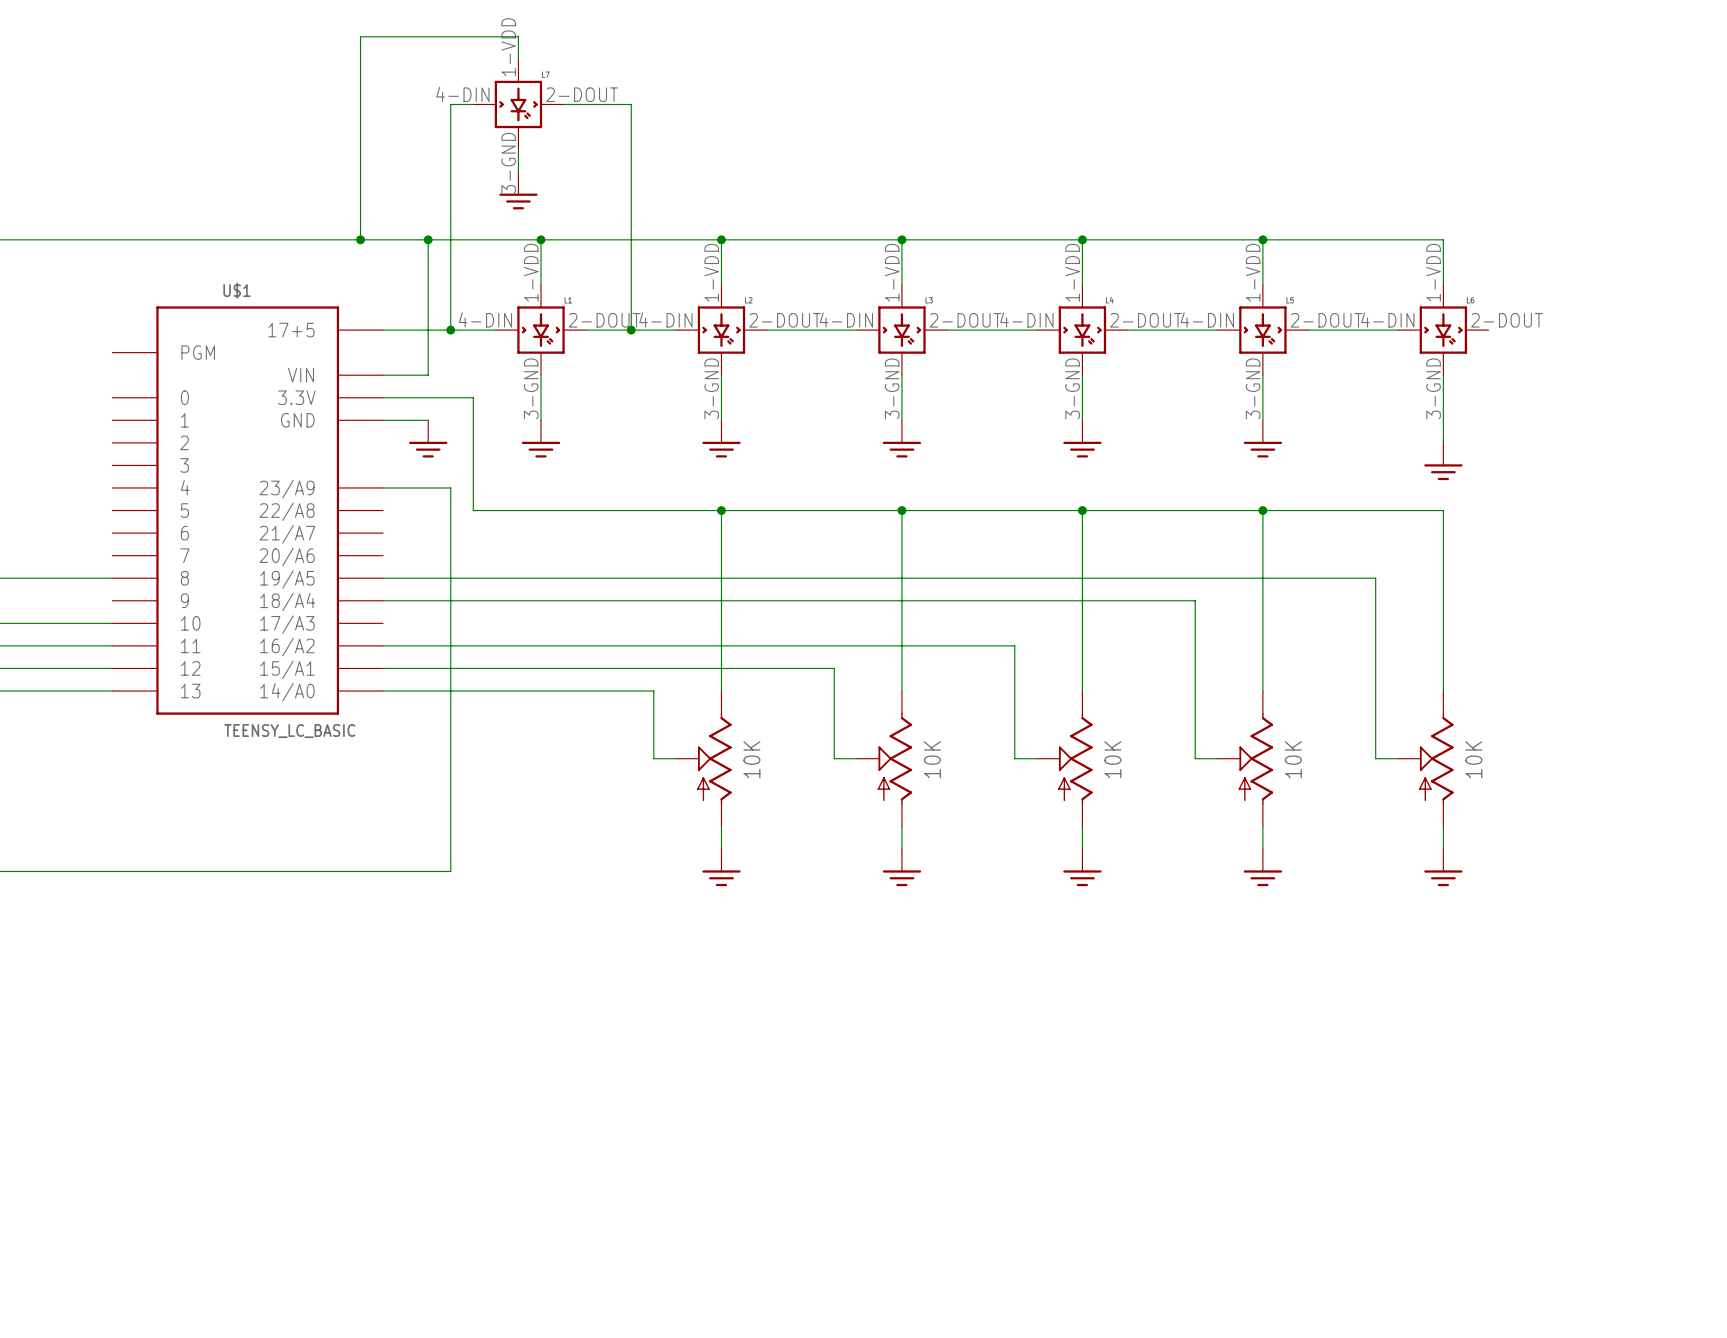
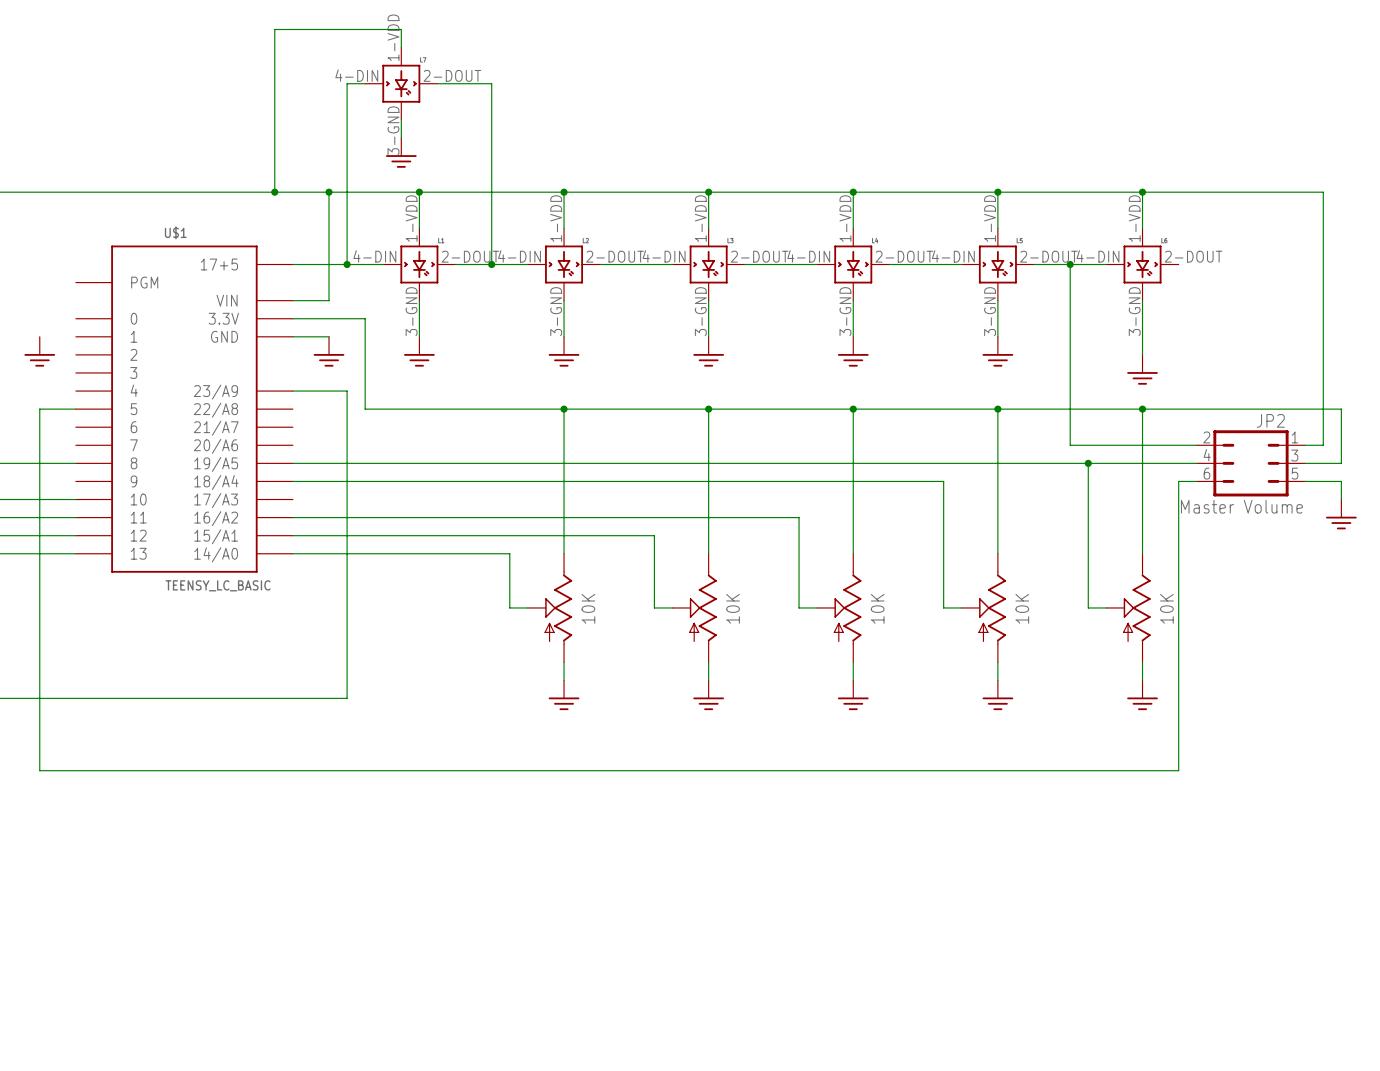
wire: none -> (1142, 192) (1323, 192) (1323, 445) (1305, 445)
junction: none -> (1142, 192)
wire: none -> (1070, 264) (1070, 445) (1196, 445)
junction: none -> (1070, 264)
power symbol: none -> (39, 351)
wire: none -> (75, 409) (39, 409) (39, 770) (1178, 770) (1178, 481) (1196, 481)
wire: none -> (1142, 409) (1341, 409) (1341, 463) (1305, 463)
junction: none -> (1142, 409)
wire: none -> (1088, 463) (1196, 463)
junction: none -> (1088, 463)
JP2: none -> Master Volume (1250, 463)
wire: none -> (1305, 481) (1341, 481) (1341, 499)
power symbol: none -> (1341, 514)

